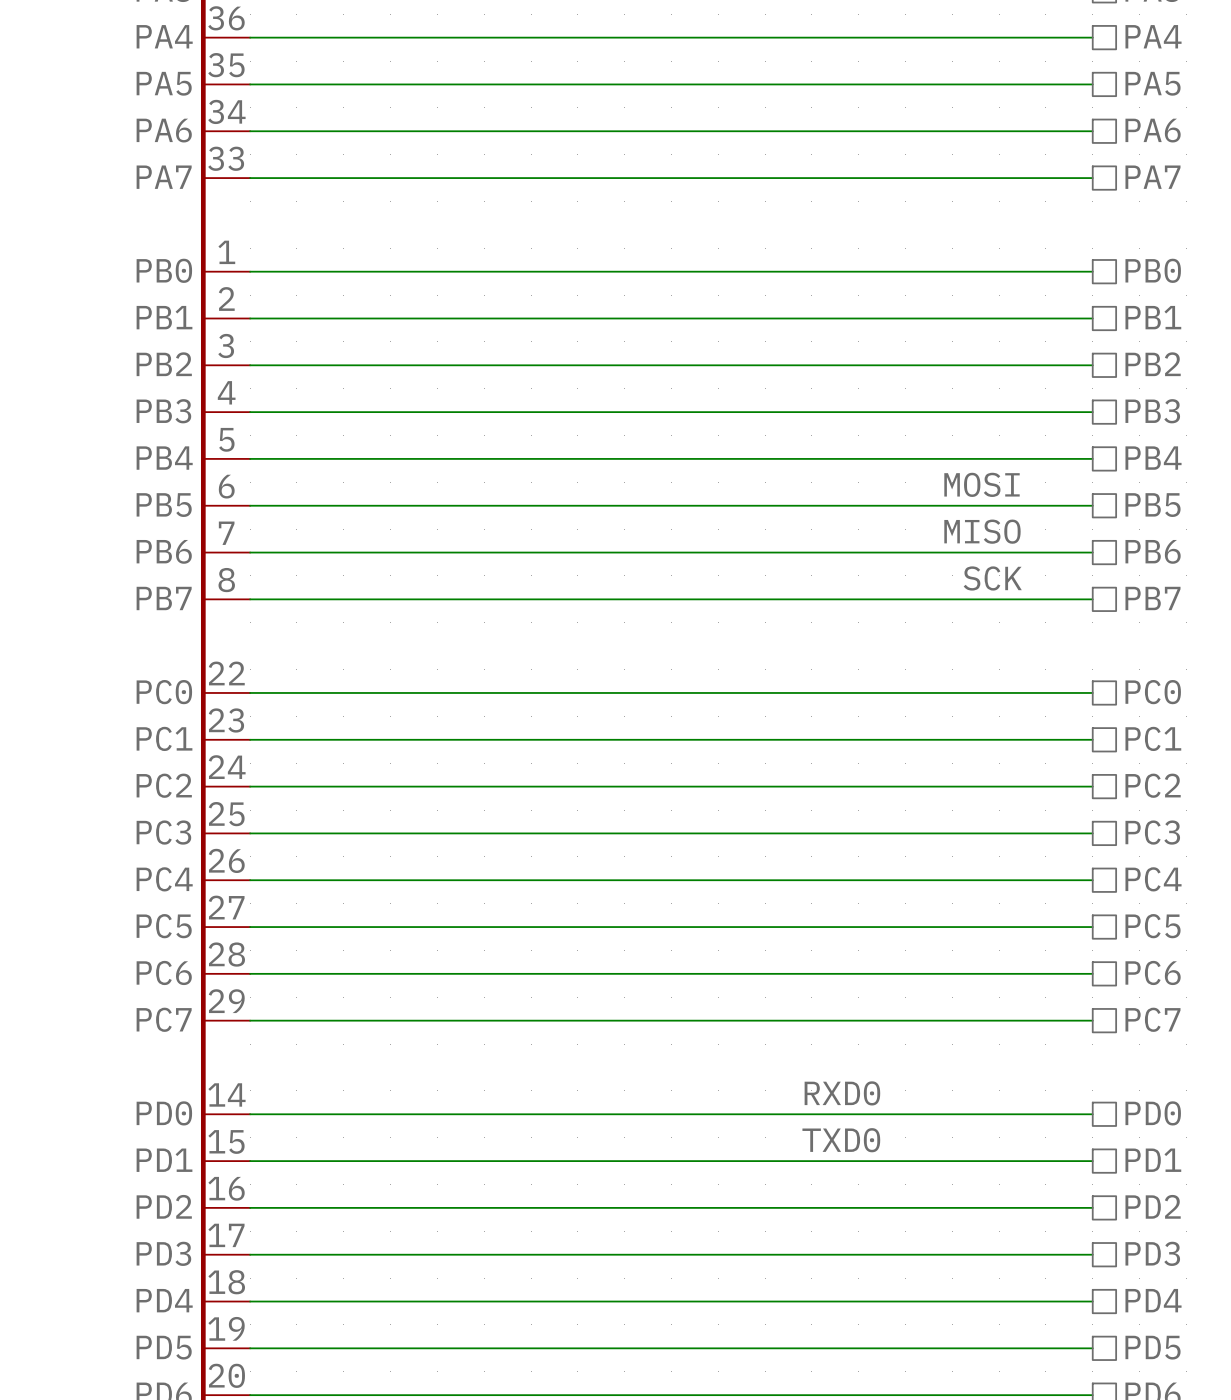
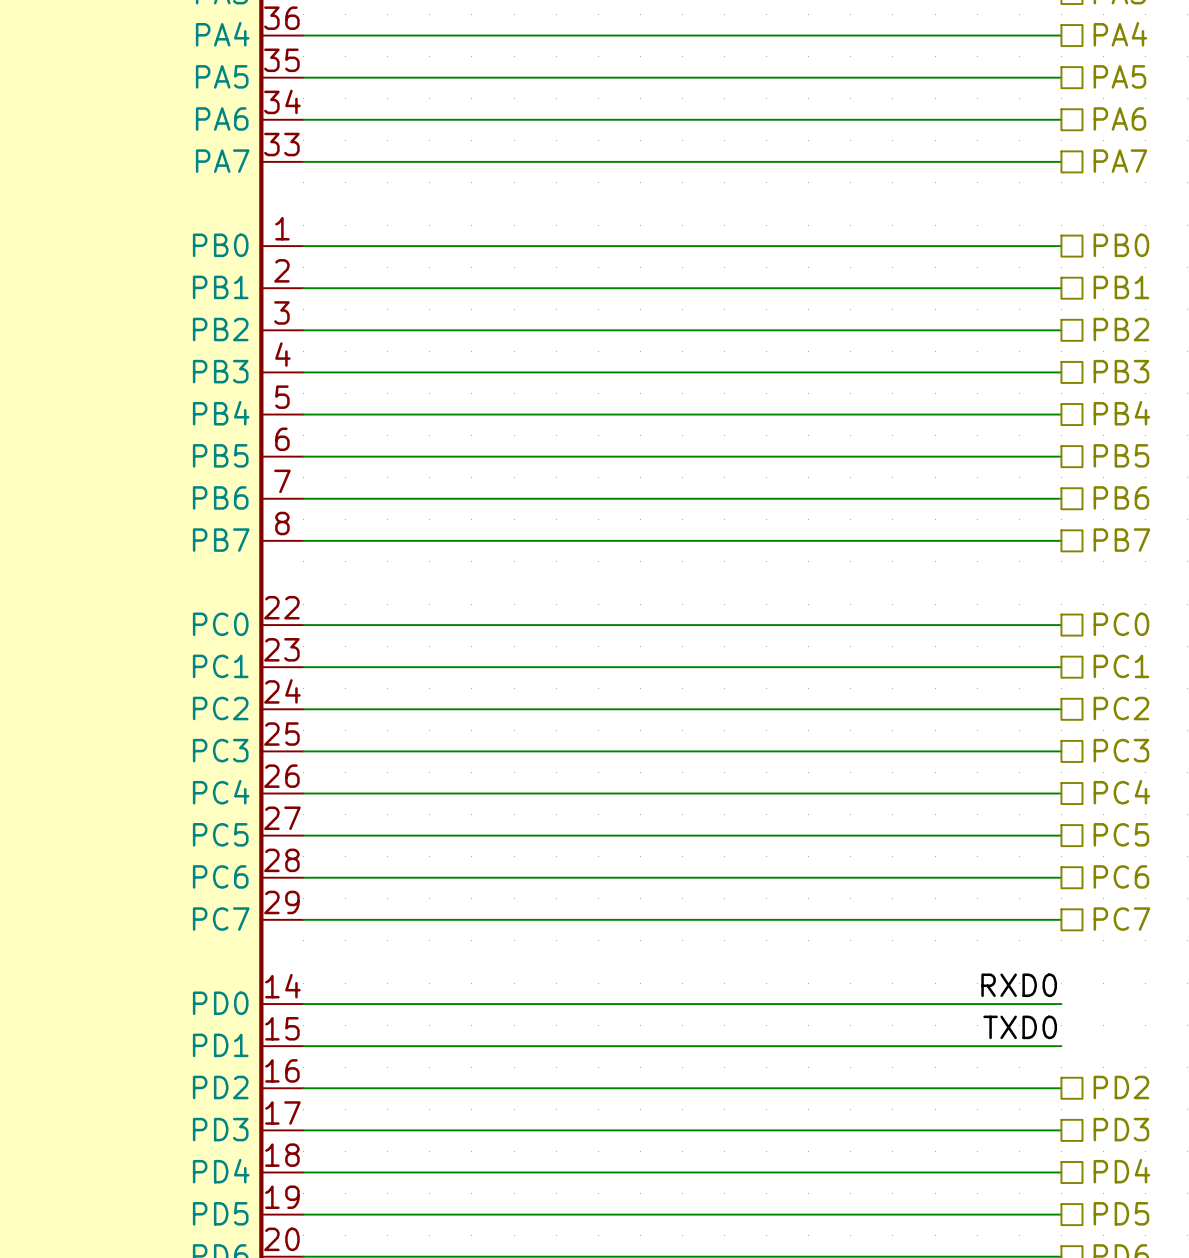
label: MOSI (982, 484) -> none
label: MISO (982, 531) -> none
label: SCK (992, 578) -> none
label position: RXD0 (842, 1093) -> RXD0 (1019, 985)
hierarchical label: PD0 (1153, 1113) -> none
label position: TXD0 (841, 1140) -> TXD0 (1020, 1027)
hierarchical label: PD1 (1153, 1160) -> none

